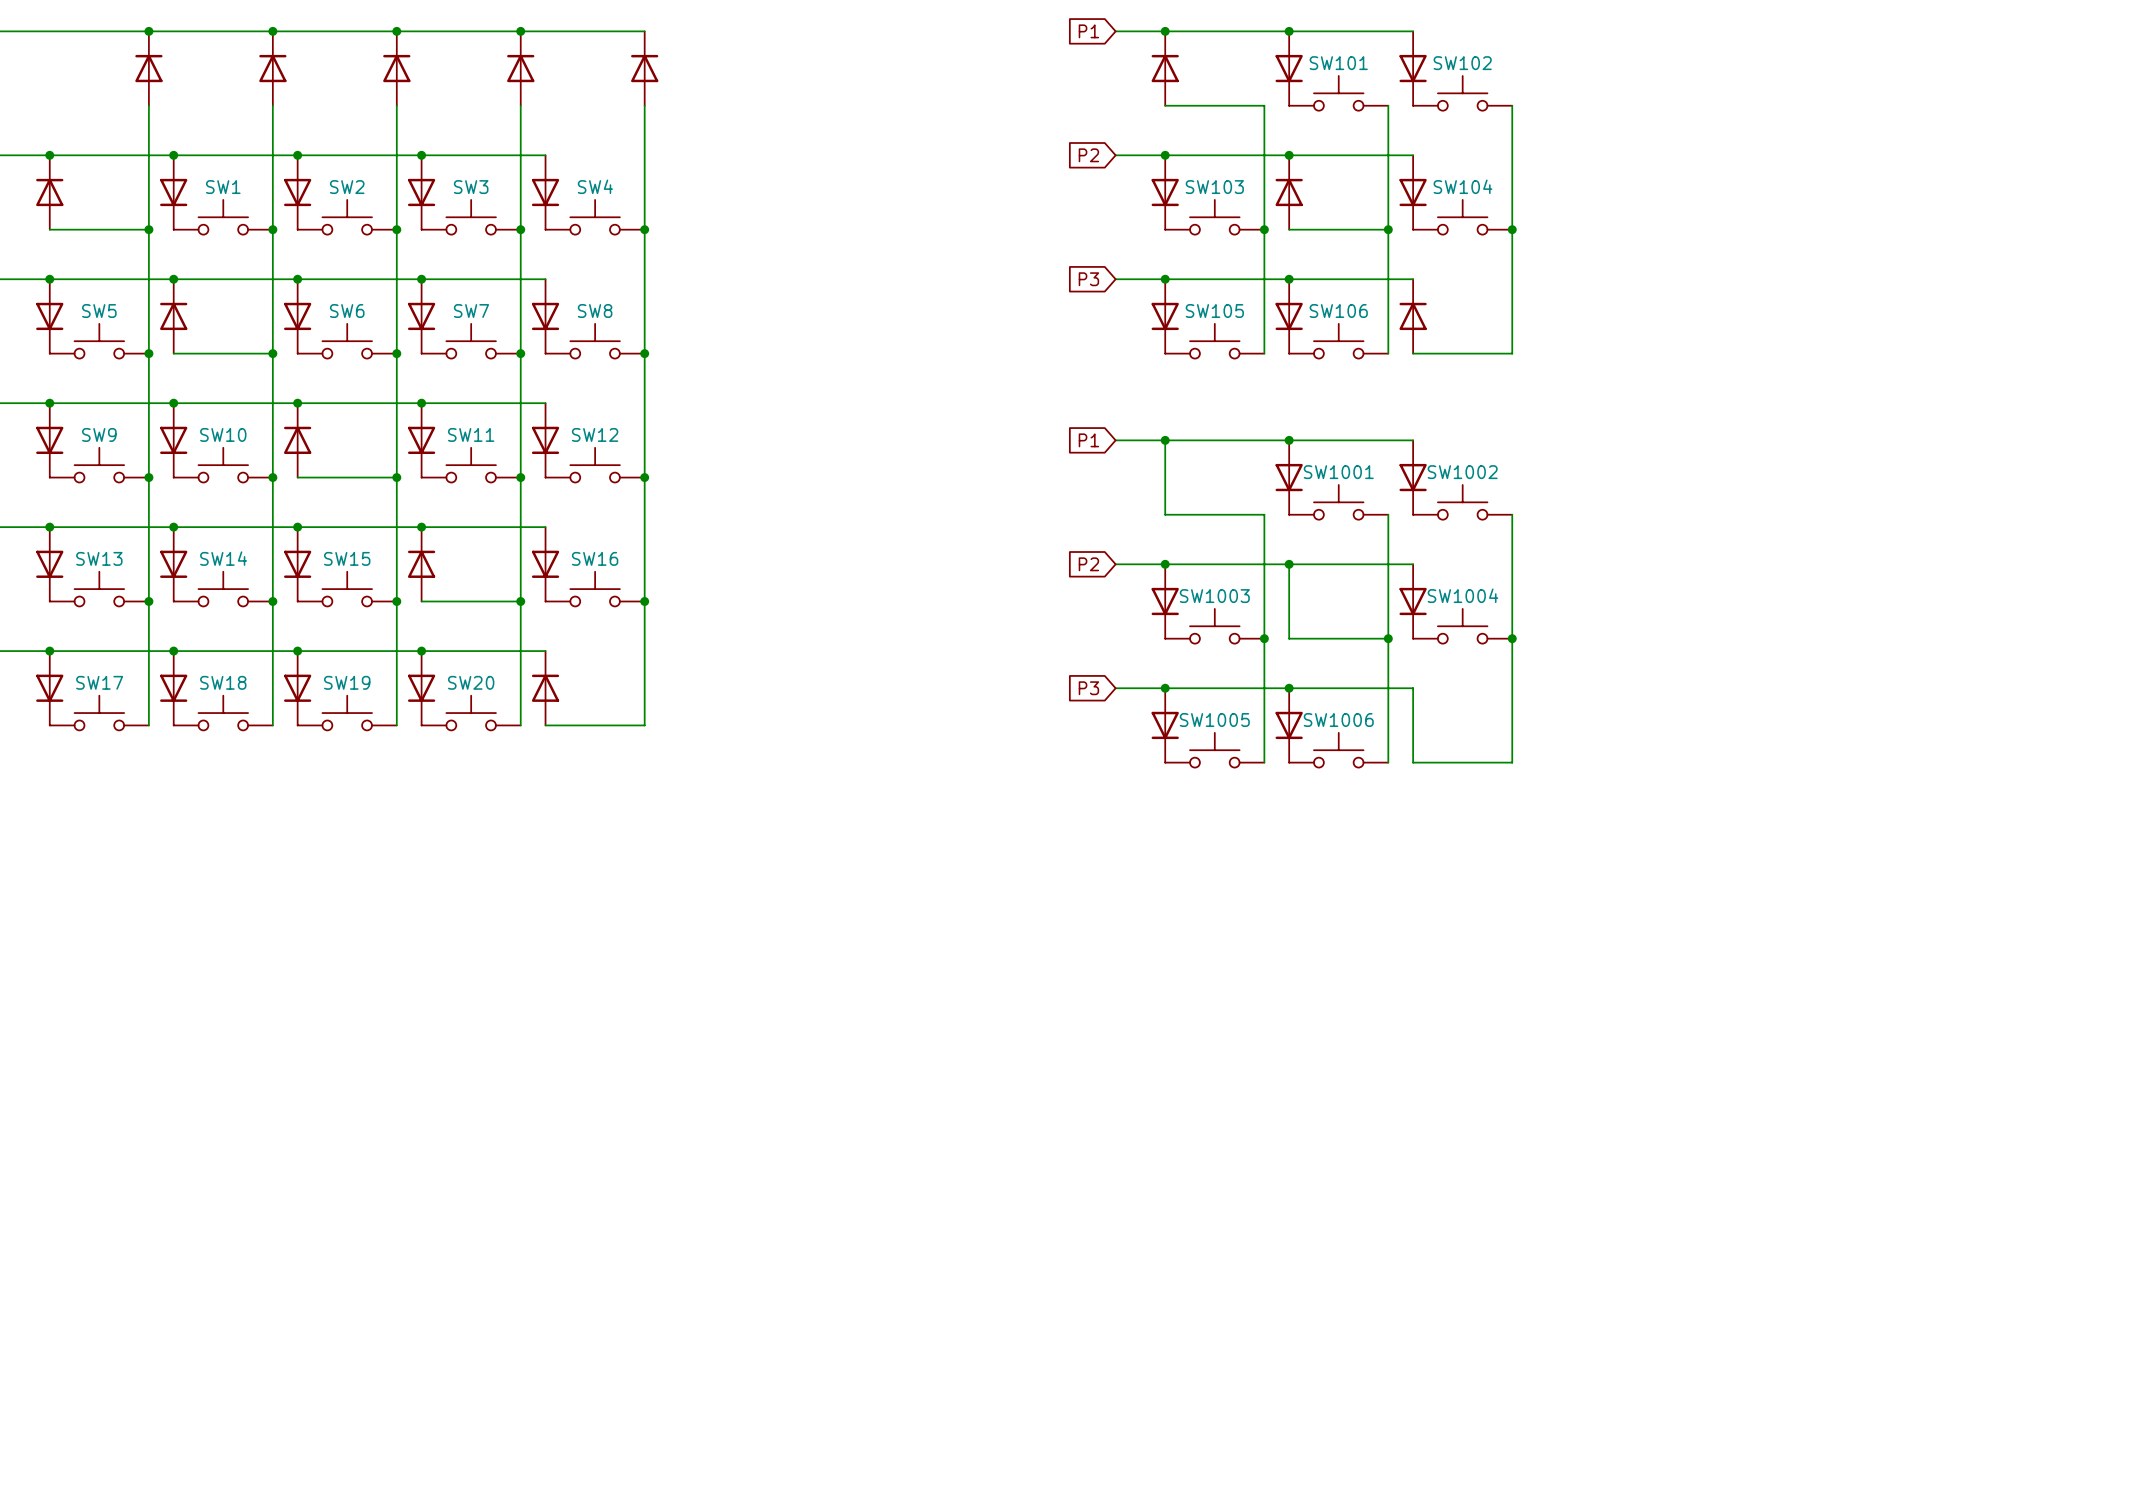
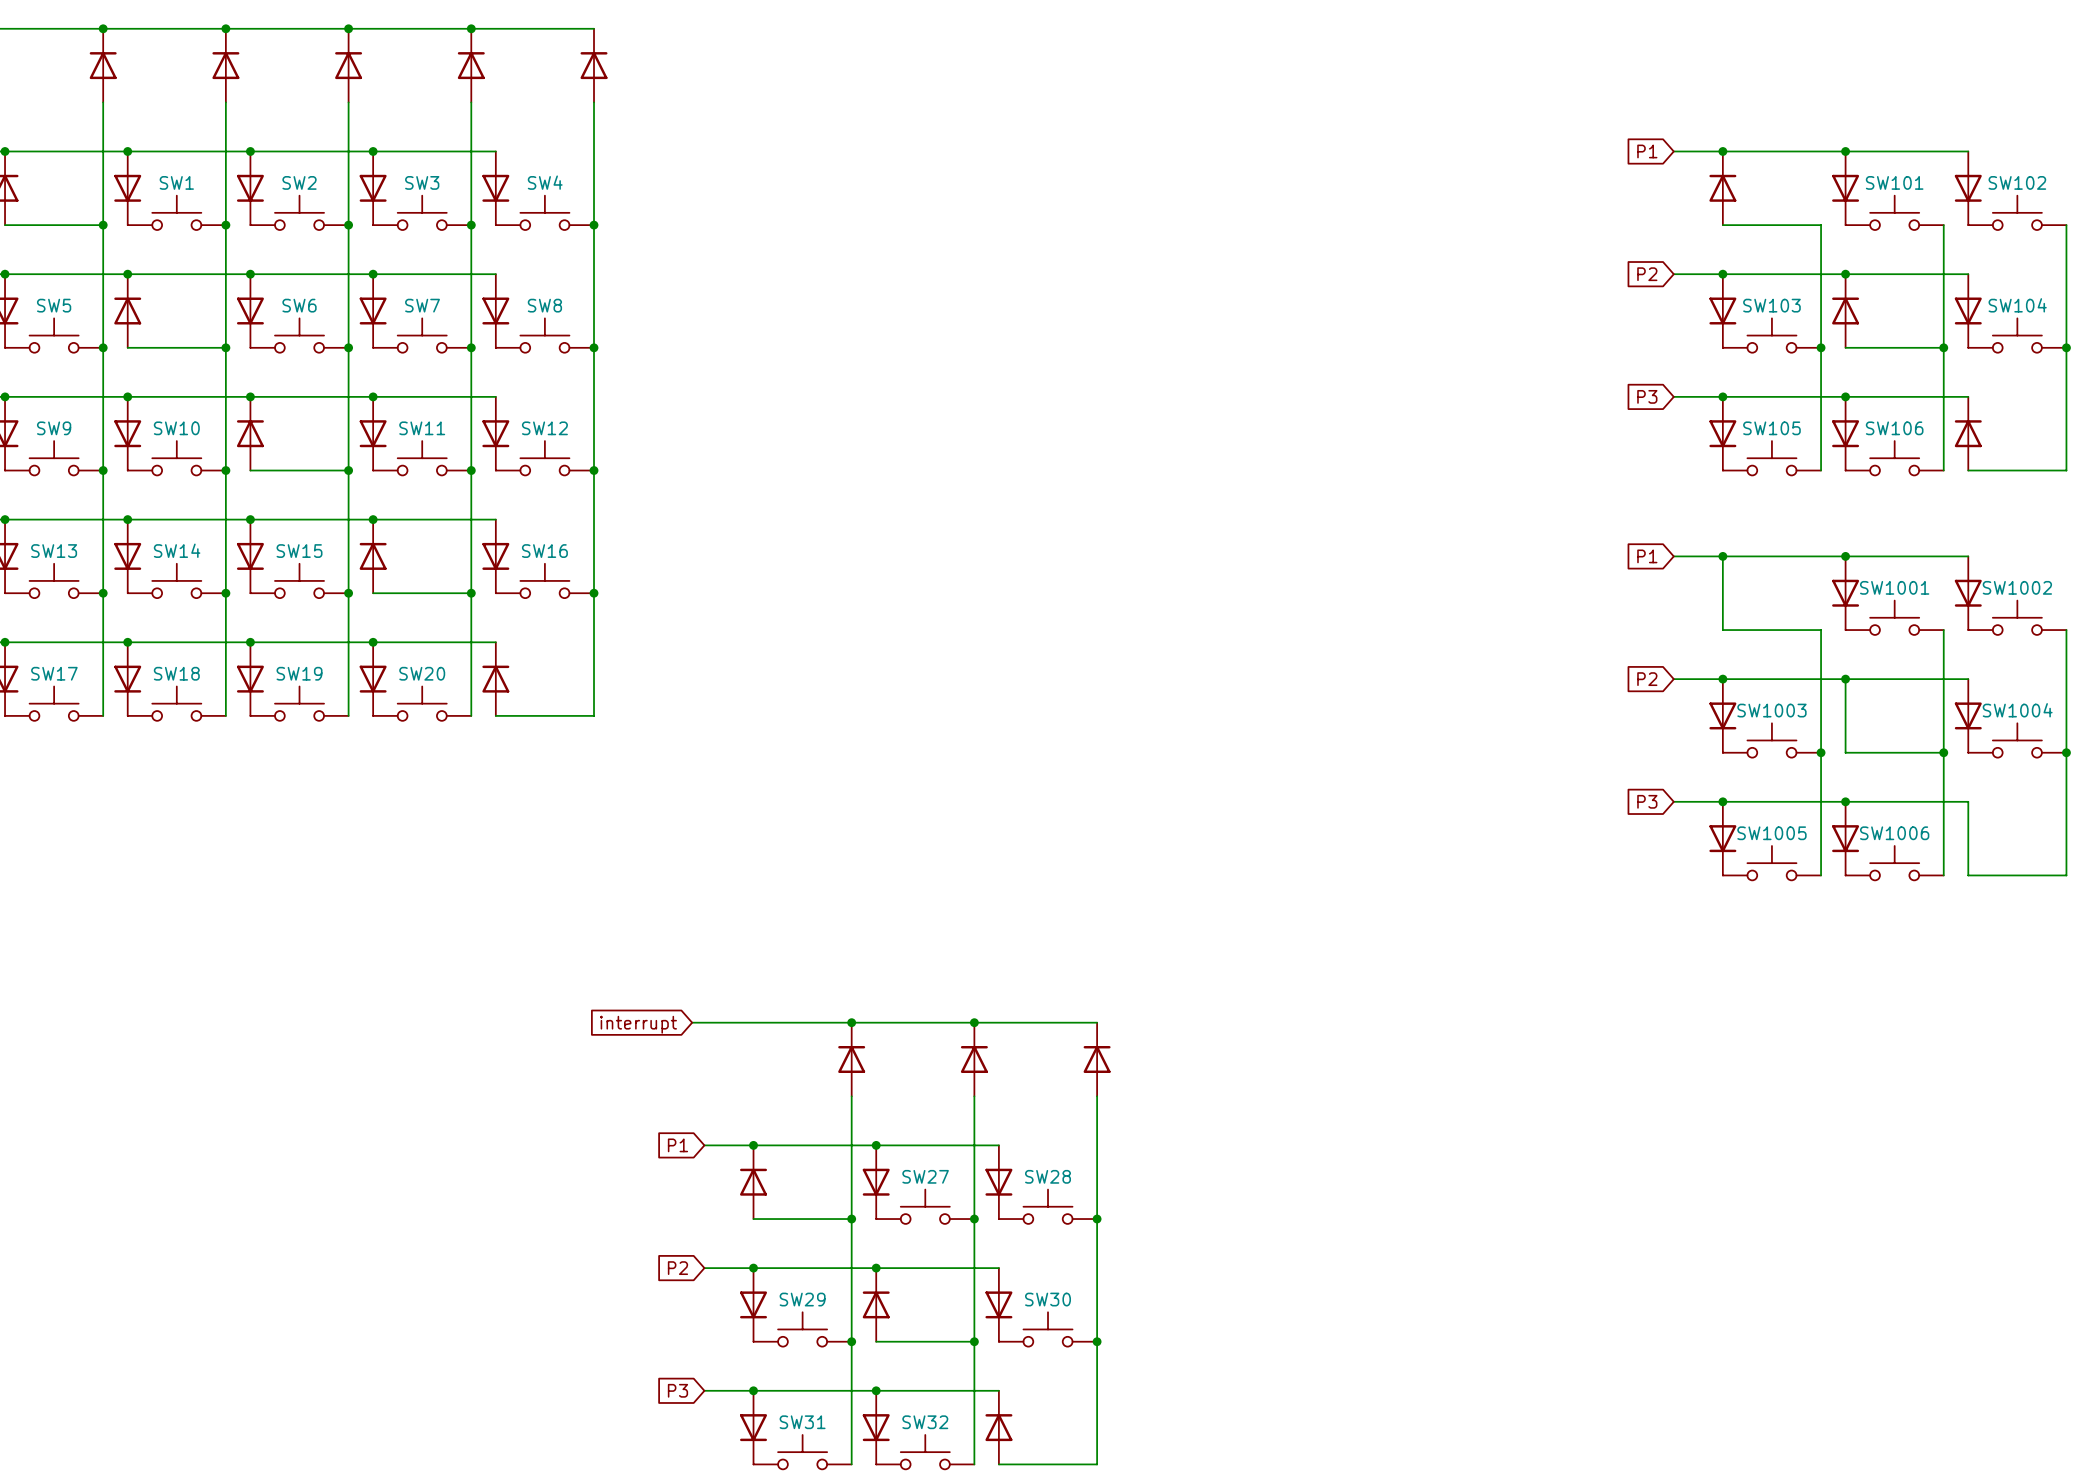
global label: P1 (1088, 31) -> none
wire: (1115, 31) (1413, 31) -> none
junction: (1165, 31) -> none
junction: (1289, 31) -> none
part: (1165, 68) -> none
part: (1289, 68) -> none
part: (1413, 68) -> none
SW101 position: (1338, 93) -> (1894, 212)
SW102 position: (1462, 93) -> (2017, 212)
wire: (1165, 105) (1264, 105) (1264, 353) -> none
wire: (1388, 105) (1388, 353) -> none
wire: (1512, 105) (1512, 353) (1413, 353) -> none
global label: P2 (1088, 155) -> none
wire: (1115, 155) (1413, 155) -> none
junction: (1165, 155) -> none
junction: (1289, 155) -> none
global label: none -> P1 (1647, 151)
wire: none -> (1673, 151) (1968, 151)
junction: none -> (1722, 151)
junction: none -> (1845, 151)
part: (1165, 192) -> none
part: (1289, 192) -> none
part: (1413, 192) -> none
part: none -> (1722, 188)
part: none -> (1845, 188)
part: none -> (1968, 188)
SW103 position: (1214, 217) -> (1771, 335)
SW104 position: (1462, 217) -> (2017, 335)
junction: (1264, 229) -> none
wire: (1289, 229) (1388, 229) -> none
junction: (1388, 229) -> none
junction: (1512, 229) -> none
wire: none -> (1722, 225) (1821, 225) (1821, 470)
wire: none -> (1943, 225) (1943, 470)
wire: none -> (2066, 225) (2066, 470) (1968, 470)
global label: P3 (1088, 279) -> none
wire: (1115, 279) (1413, 279) -> none
junction: (1165, 279) -> none
junction: (1289, 279) -> none
global label: none -> P2 (1647, 274)
wire: none -> (1673, 274) (1968, 274)
junction: none -> (1722, 274)
junction: none -> (1845, 274)
part: (1165, 316) -> none
part: (1289, 316) -> none
part: (1413, 316) -> none
part: none -> (1722, 311)
part: none -> (1845, 311)
part: none -> (1968, 311)
SW105 position: (1214, 341) -> (1771, 458)
SW106 position: (1338, 341) -> (1894, 458)
junction: none -> (1821, 347)
wire: none -> (1845, 347) (1943, 347)
junction: none -> (1943, 347)
junction: none -> (2066, 347)
global label: none -> P3 (1647, 396)
wire: none -> (1673, 396) (1968, 396)
junction: none -> (1722, 396)
junction: none -> (1845, 396)
global label: P1 (1088, 440) -> none
wire: (1115, 440) (1413, 440) -> none
wire: (1165, 440) (1165, 514) (1264, 514) (1264, 762) -> none
junction: (1165, 440) -> none
junction: (1289, 440) -> none
part: none -> (1722, 433)
part: none -> (1845, 433)
part: none -> (1968, 433)
part: (1289, 477) -> none
part: (1413, 477) -> none
SW1001 position: (1338, 502) -> (1894, 617)
SW1002 position: (1462, 502) -> (2017, 617)
wire: (1388, 514) (1388, 762) -> none
wire: (1512, 514) (1512, 762) (1413, 762) (1413, 688) (1115, 688) -> none
global label: P2 (1088, 564) -> none
wire: (1115, 564) (1413, 564) -> none
junction: (1165, 564) -> none
wire: (1289, 564) (1289, 638) (1388, 638) -> none
junction: (1289, 564) -> none
global label: none -> P1 (1647, 556)
wire: none -> (1673, 556) (1968, 556)
wire: none -> (1722, 556) (1722, 630) (1821, 630) (1821, 875)
junction: none -> (1722, 556)
junction: none -> (1845, 556)
part: (1165, 601) -> none
part: (1413, 601) -> none
part: none -> (1845, 593)
part: none -> (1968, 593)
SW1003 position: (1214, 626) -> (1771, 740)
SW1004 position: (1462, 626) -> (2017, 740)
junction: (1264, 638) -> none
junction: (1388, 638) -> none
junction: (1512, 638) -> none
wire: none -> (1943, 630) (1943, 875)
wire: none -> (2066, 630) (2066, 875) (1968, 875) (1968, 801) (1673, 801)
global label: P3 (1088, 688) -> none
junction: (1165, 688) -> none
junction: (1289, 688) -> none
global label: none -> P2 (1647, 679)
wire: none -> (1673, 679) (1968, 679)
junction: none -> (1722, 679)
wire: none -> (1845, 679) (1845, 752) (1943, 752)
junction: none -> (1845, 679)
part: (1165, 725) -> none
part: (1289, 725) -> none
part: none -> (1722, 715)
part: none -> (1968, 715)
SW1005 position: (1214, 750) -> (1771, 863)
SW1006 position: (1338, 750) -> (1894, 863)
junction: none -> (1821, 752)
junction: none -> (1943, 752)
junction: none -> (2066, 752)
global label: none -> P3 (1647, 801)
junction: none -> (1722, 801)
junction: none -> (1845, 801)
part: none -> (1722, 838)
part: none -> (1845, 838)
wire: none -> (692, 1022) (1097, 1022)
junction: none -> (851, 1022)
junction: none -> (974, 1022)
global label: none -> interrupt (638, 1024)
part: none -> (851, 1059)
part: none -> (974, 1059)
part: none -> (1097, 1059)
wire: none -> (851, 1096) (851, 1464)
wire: none -> (974, 1096) (974, 1464)
wire: none -> (1097, 1096) (1097, 1464) (998, 1464)
global label: none -> P1 (677, 1145)
wire: none -> (704, 1145) (998, 1145)
junction: none -> (753, 1145)
junction: none -> (876, 1145)
part: none -> (753, 1182)
part: none -> (876, 1182)
part: none -> (998, 1182)
SW27: none -> (925, 1206)
SW28: none -> (1048, 1206)
wire: none -> (753, 1219) (851, 1219)
junction: none -> (851, 1219)
junction: none -> (974, 1219)
junction: none -> (1097, 1219)
global label: none -> P2 (677, 1268)
wire: none -> (704, 1268) (998, 1268)
junction: none -> (753, 1268)
junction: none -> (876, 1268)
part: none -> (753, 1304)
part: none -> (876, 1304)
part: none -> (998, 1304)
SW29: none -> (802, 1329)
SW30: none -> (1048, 1329)
junction: none -> (851, 1341)
wire: none -> (876, 1341) (974, 1341)
junction: none -> (974, 1341)
junction: none -> (1097, 1341)
global label: none -> P3 (677, 1390)
wire: none -> (704, 1390) (998, 1390)
junction: none -> (753, 1390)
junction: none -> (876, 1390)
part: none -> (753, 1427)
part: none -> (876, 1427)
part: none -> (998, 1427)
SW31: none -> (802, 1452)
SW32: none -> (925, 1452)

